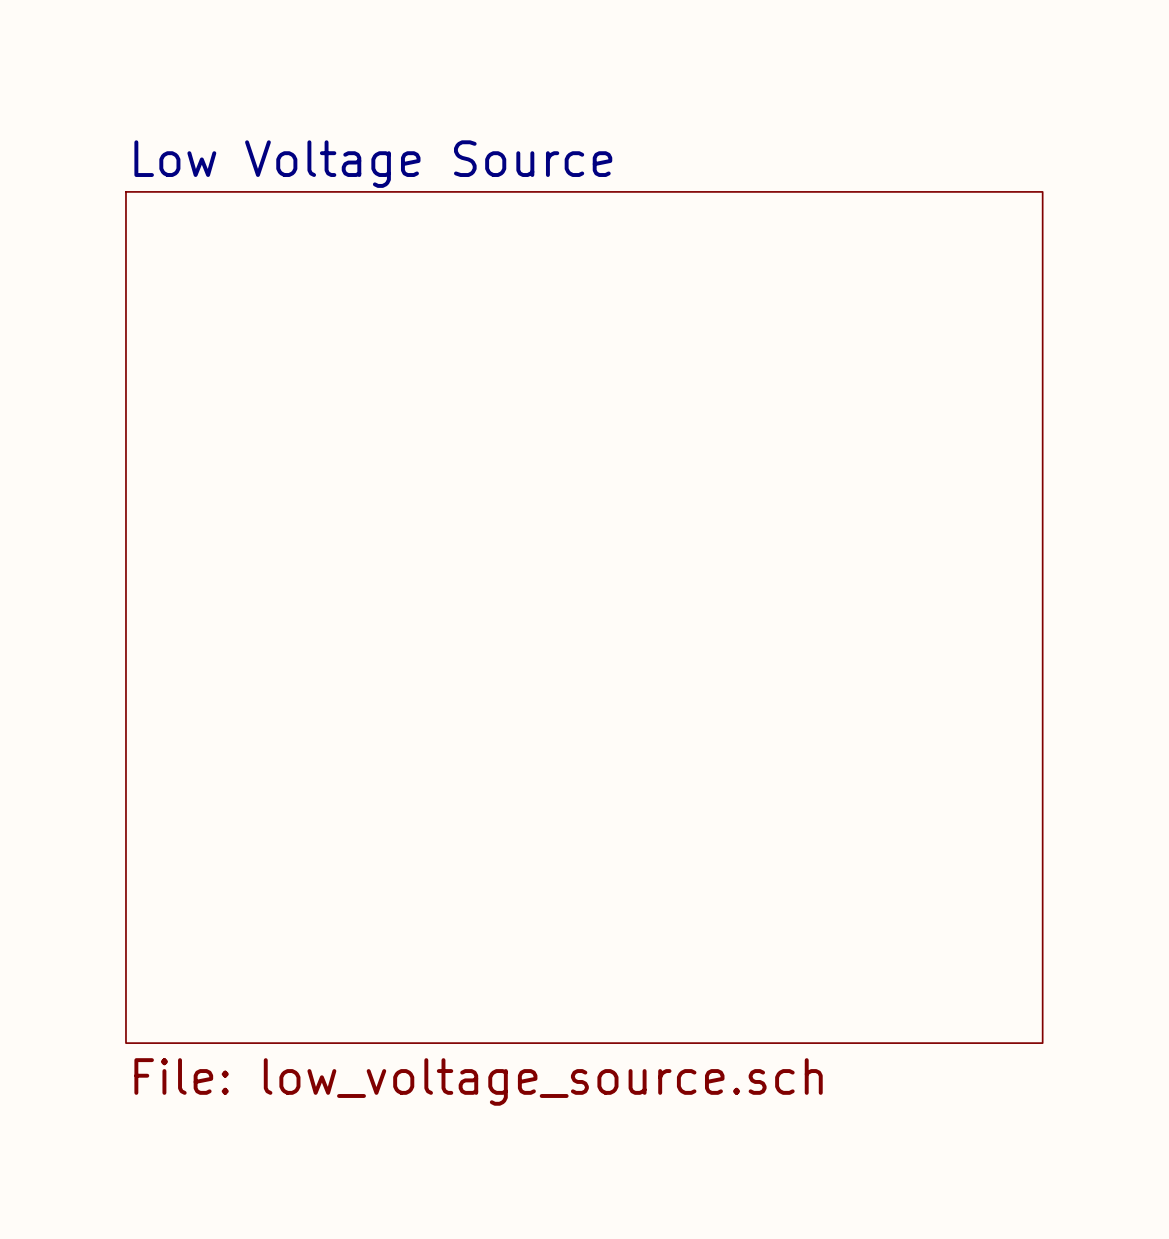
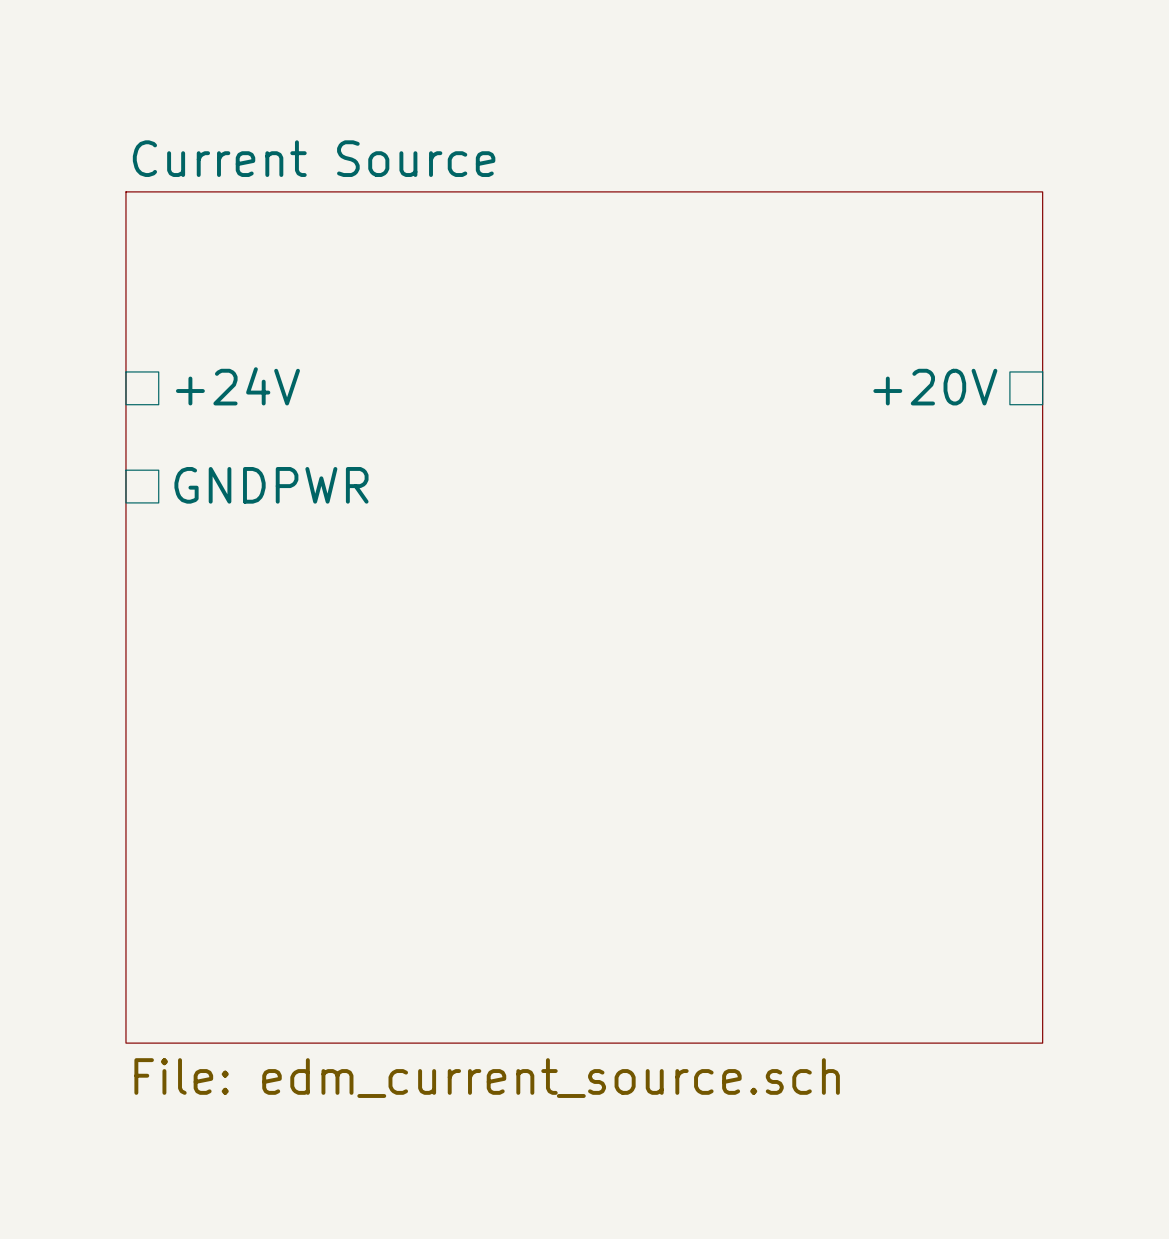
sheet Low Voltage Source name: Low Voltage Source (373, 164) -> Current Source (314, 158)
sheet pin: none -> +24V (237, 386)
sheet pin: none -> +20V (935, 387)
sheet pin: none -> GNDPWR (271, 485)
sheet Low Voltage Source value: File: low_voltage_source.sch (478, 1081) -> File: edm_current_source.sch (487, 1078)

